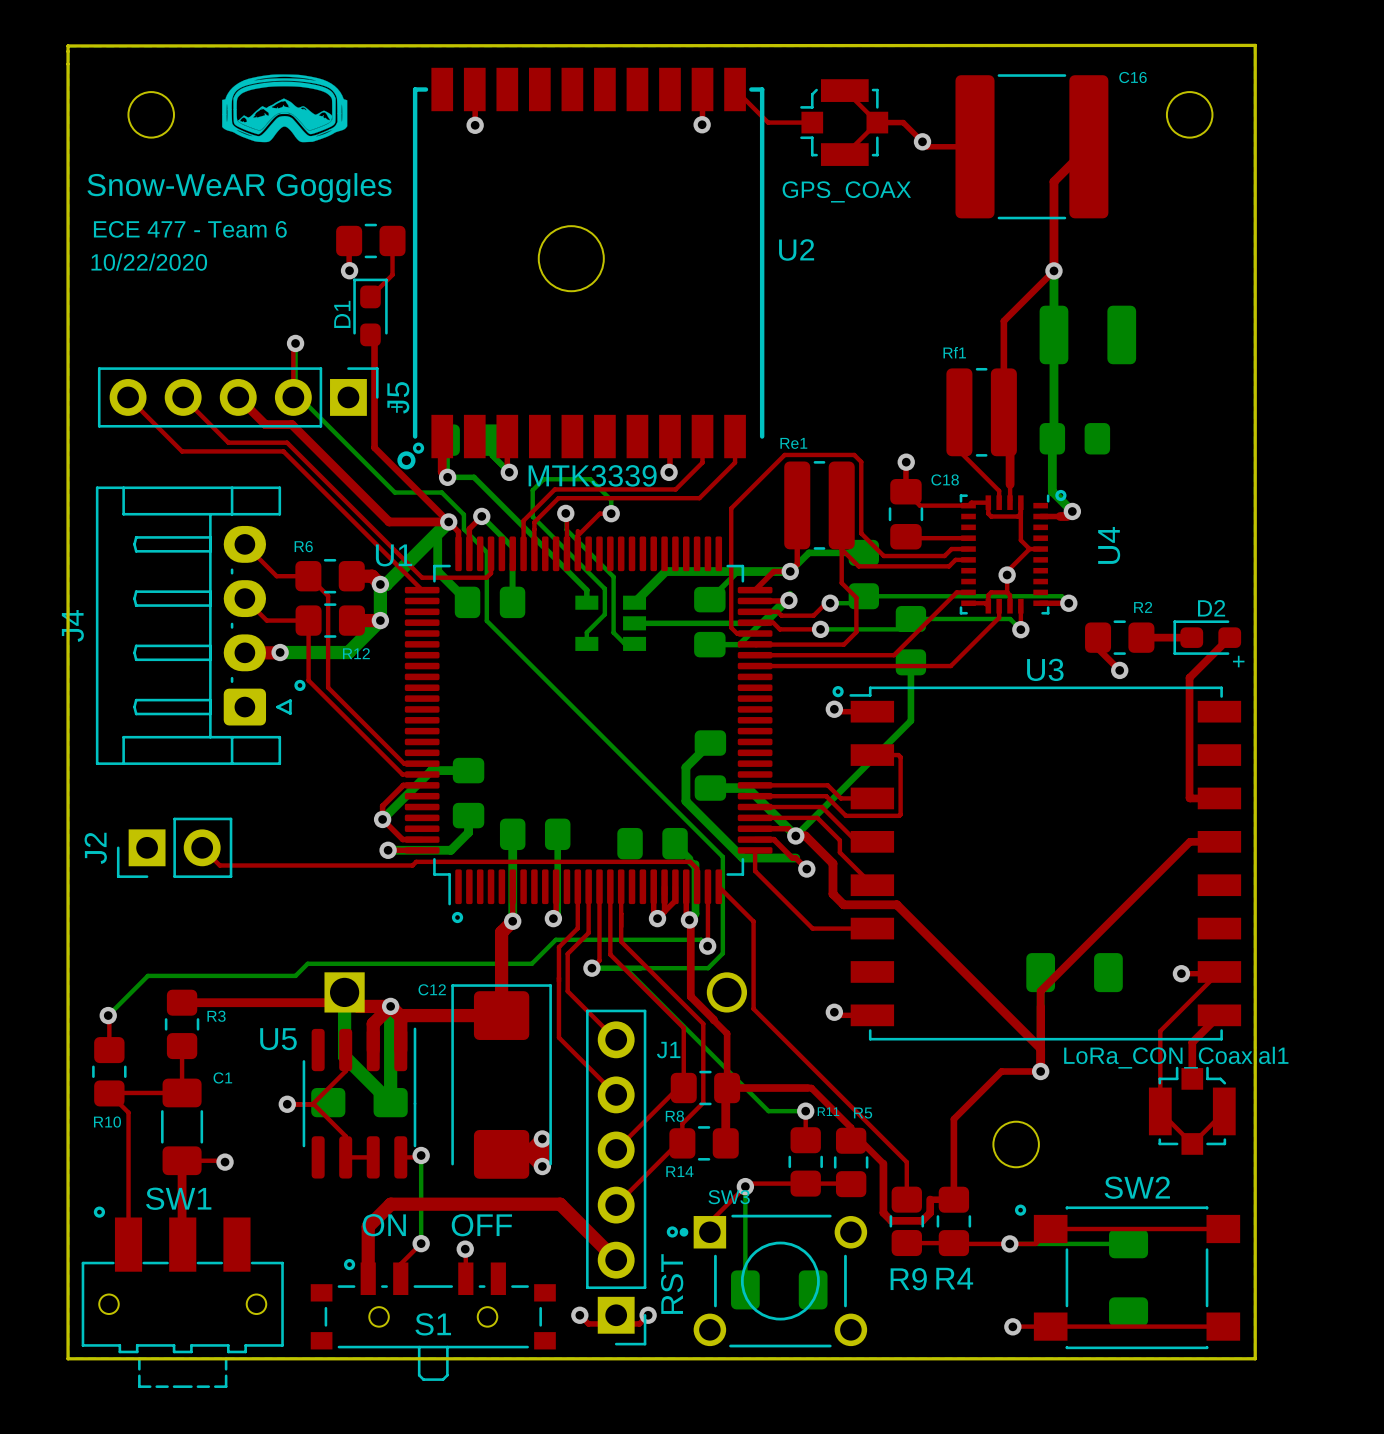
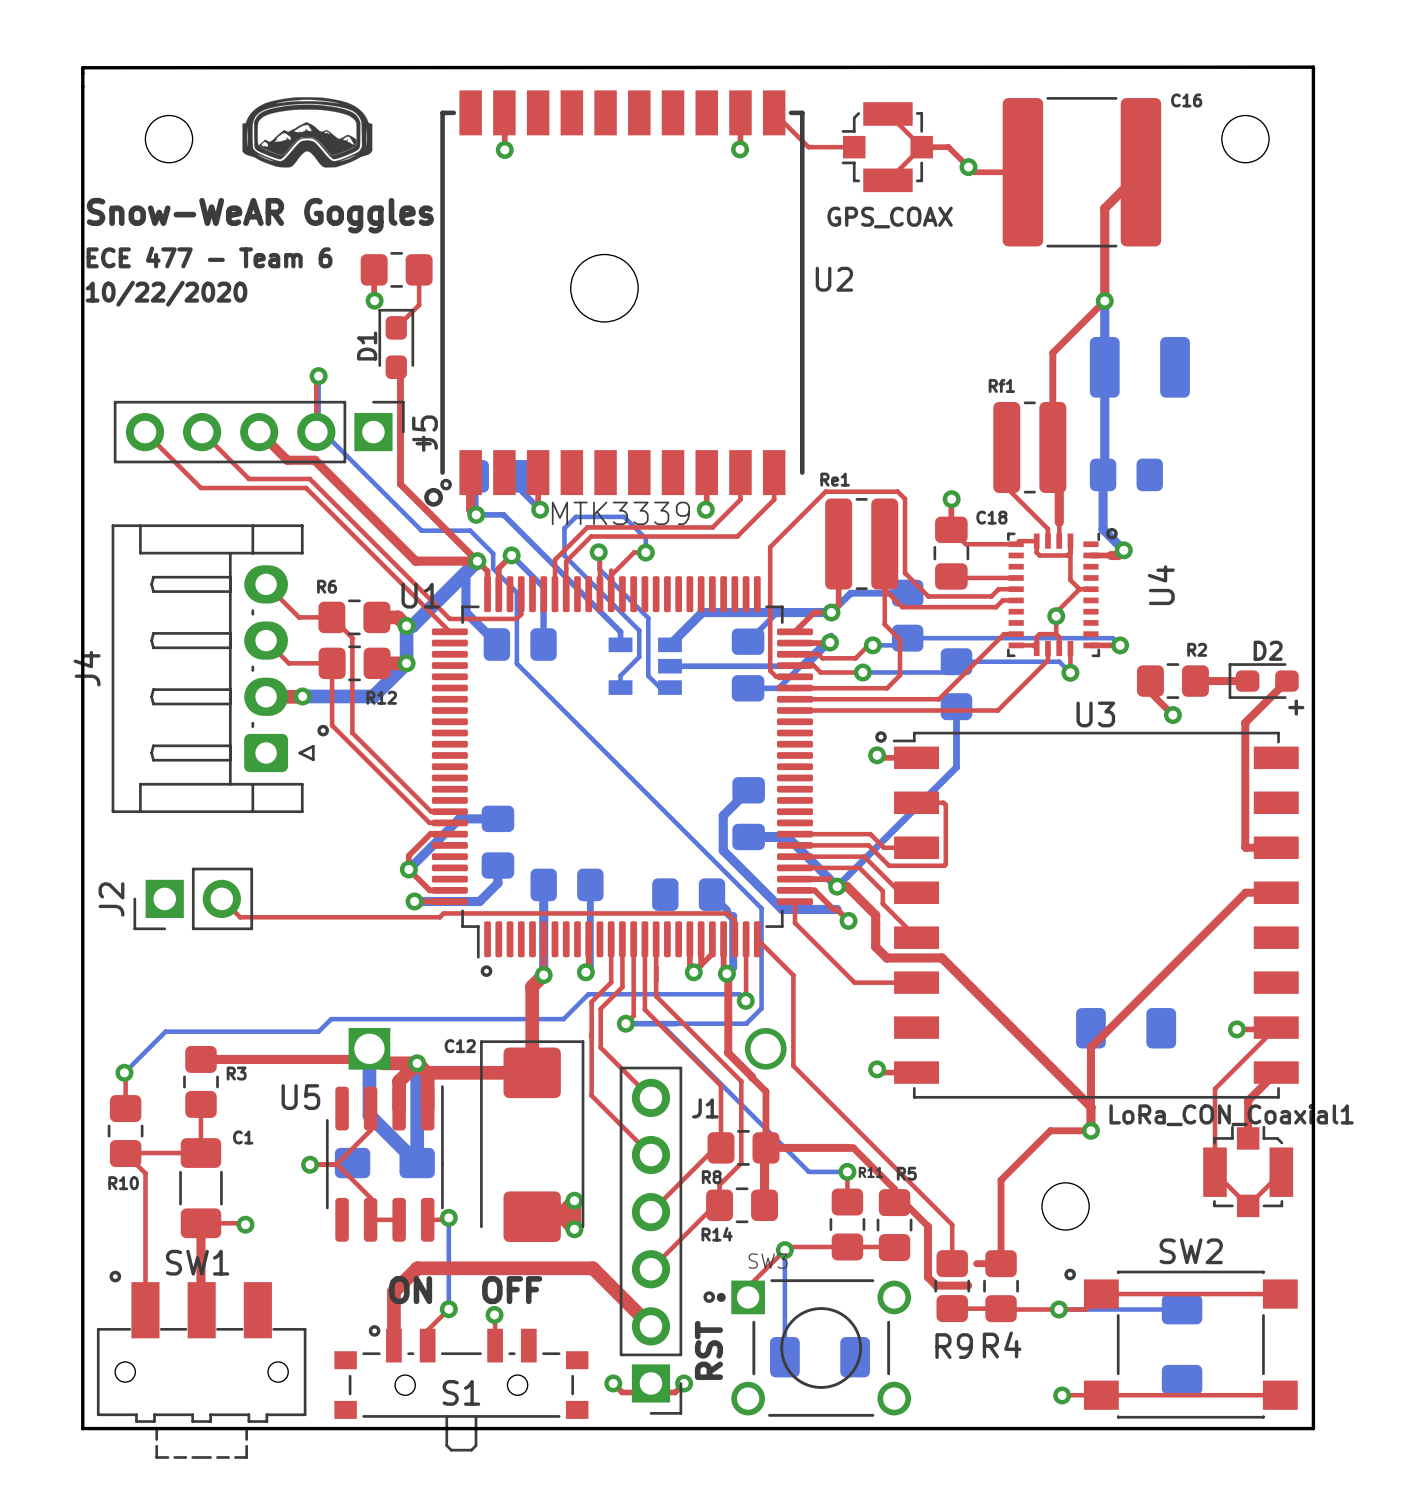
top track: (930, 1199) (930, 1212) (922, 1220) -> none

